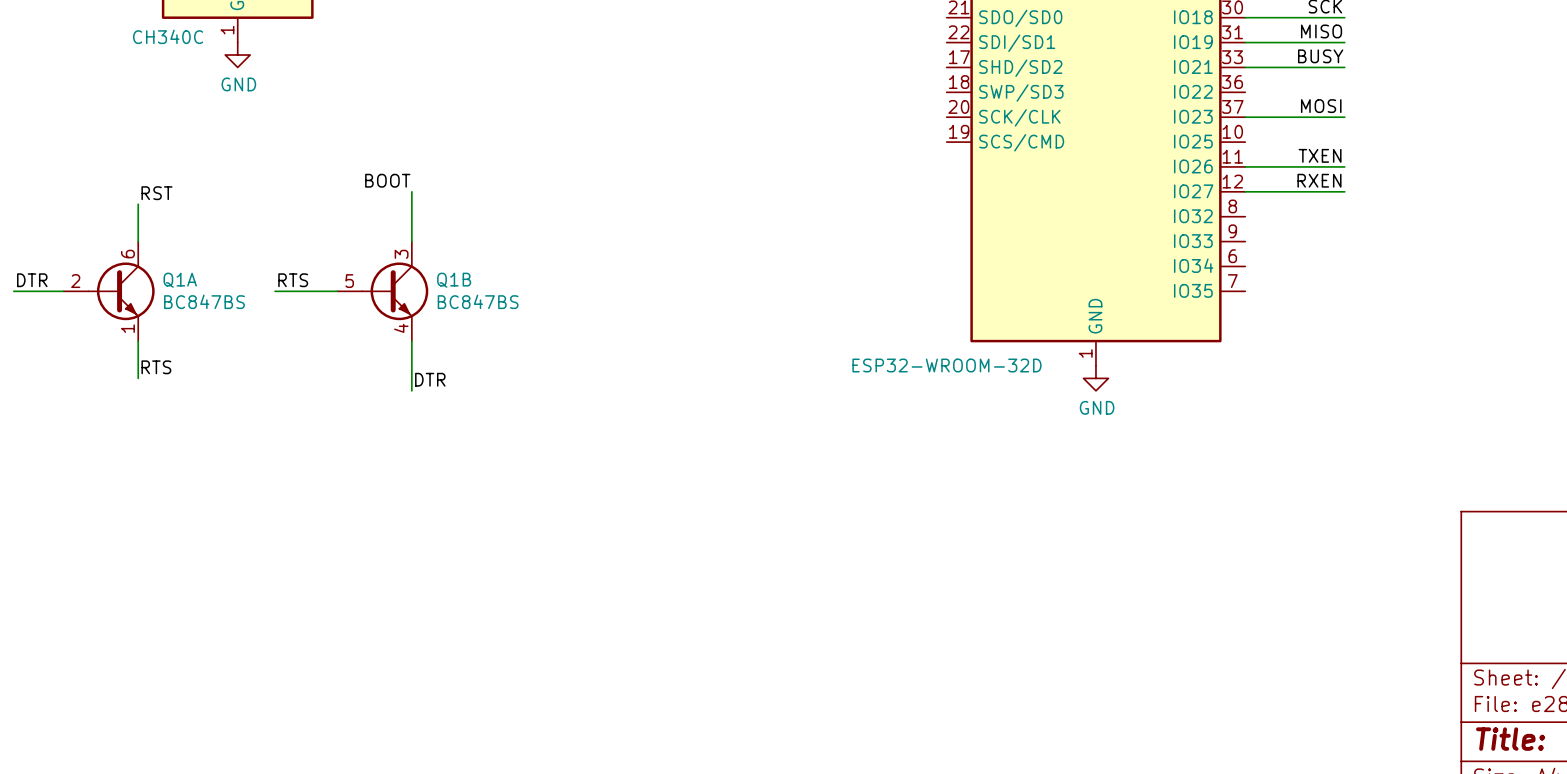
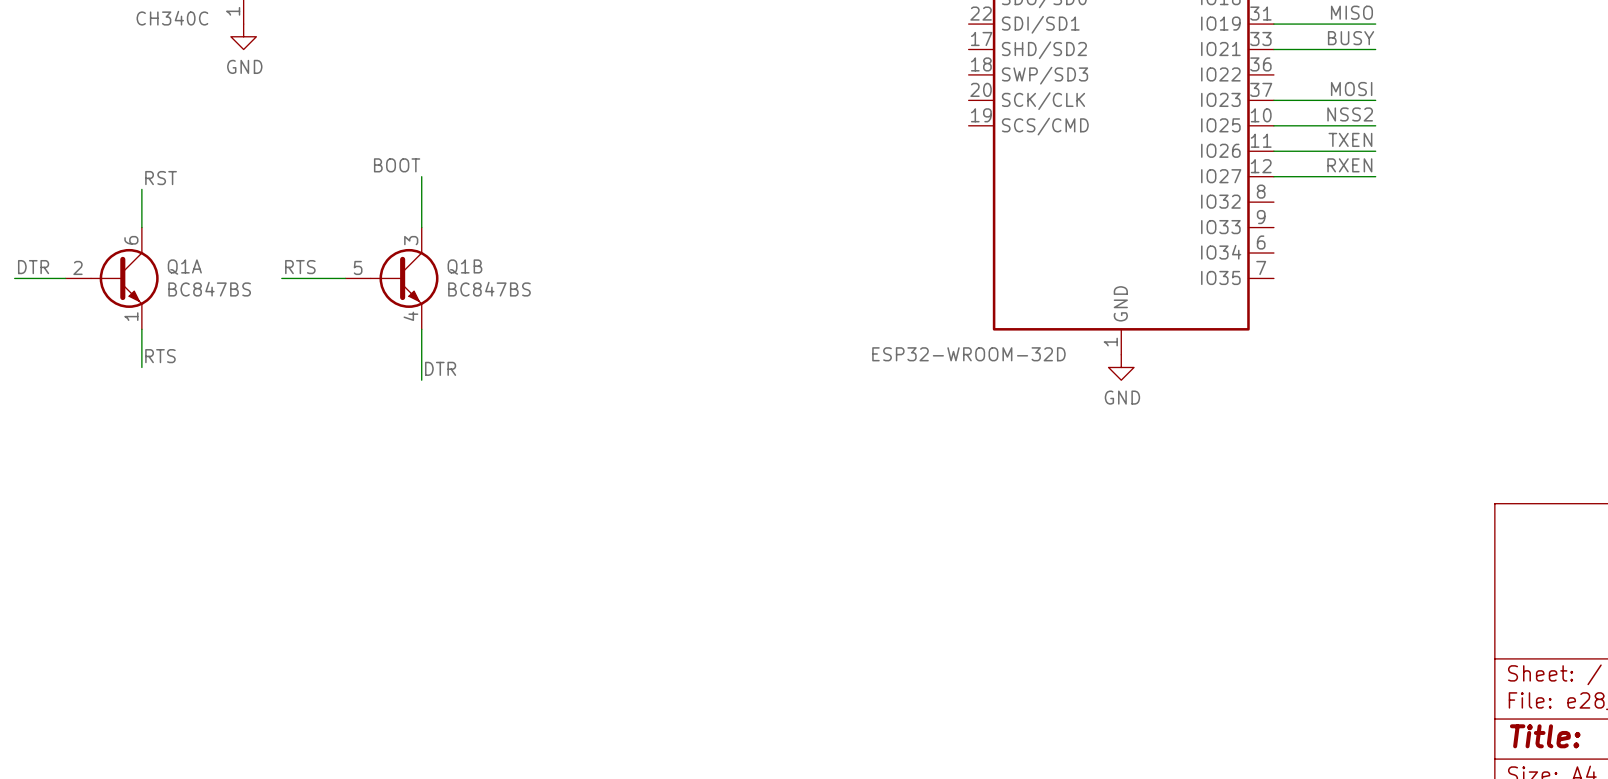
label: none -> NSS2 (1350, 114)
wire: none -> (1273, 125) (1375, 125)

